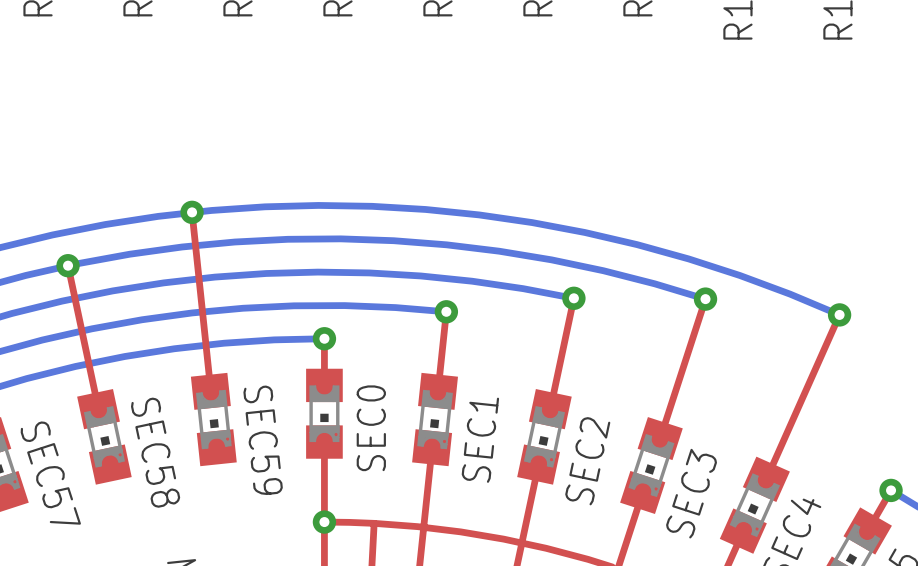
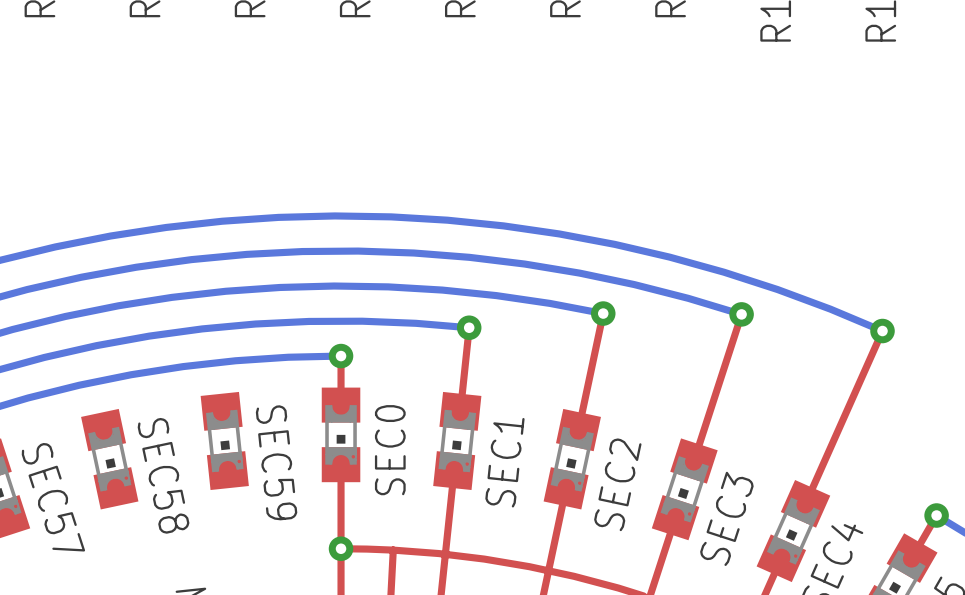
top track: (192, 212) (210, 391) -> none
via: (192, 212) -> none
top track: (68, 265) (98, 409) -> none
via: (68, 265) -> none

